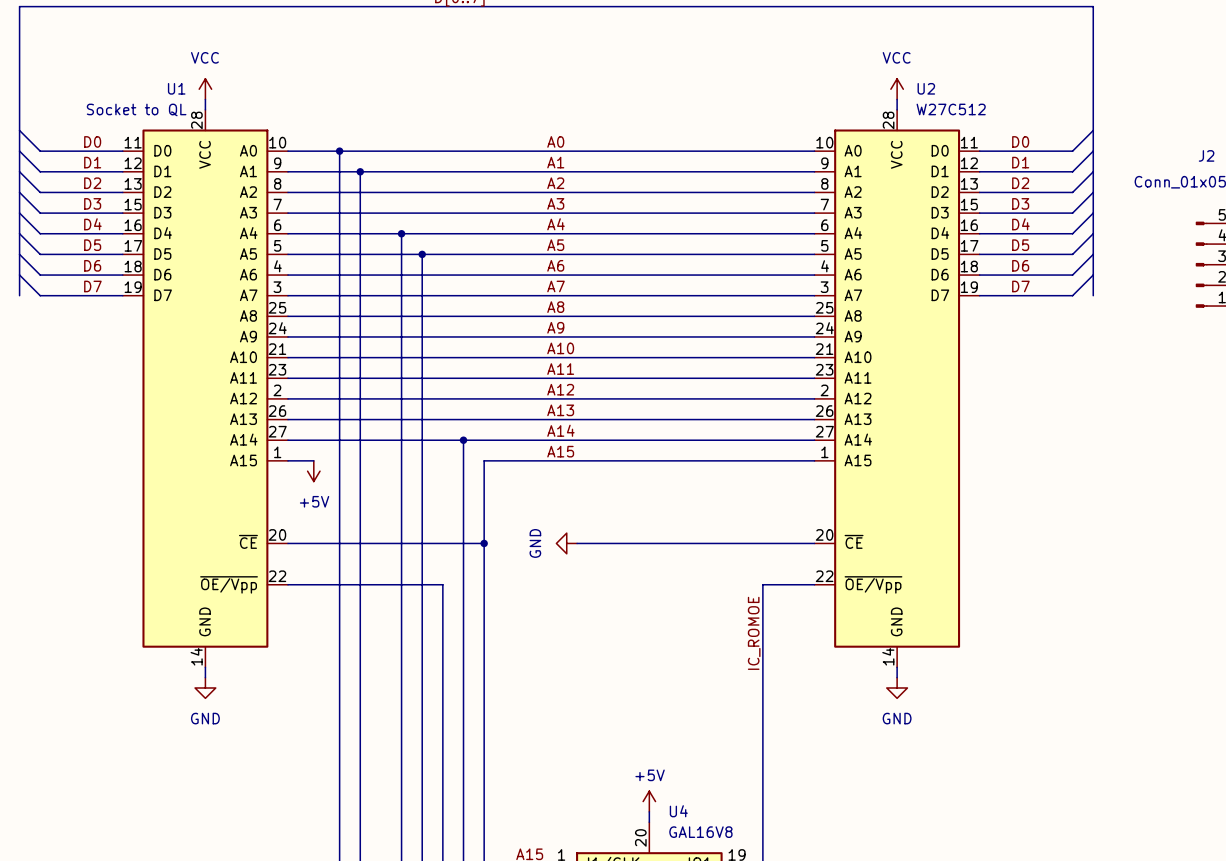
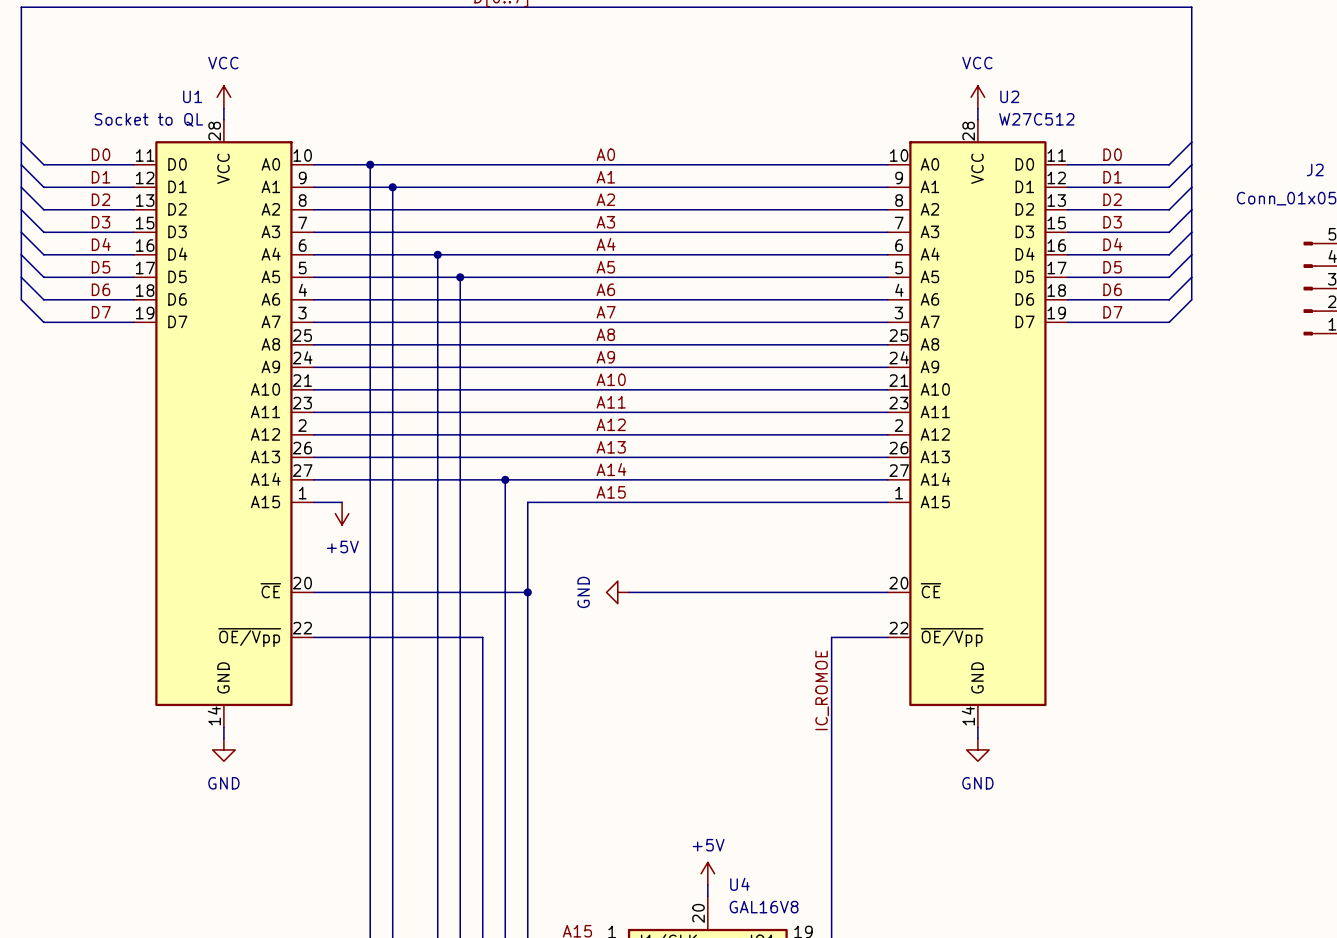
bus: (19, 275) (19, 295) -> none
bus: (1093, 275) (1093, 295) -> none

